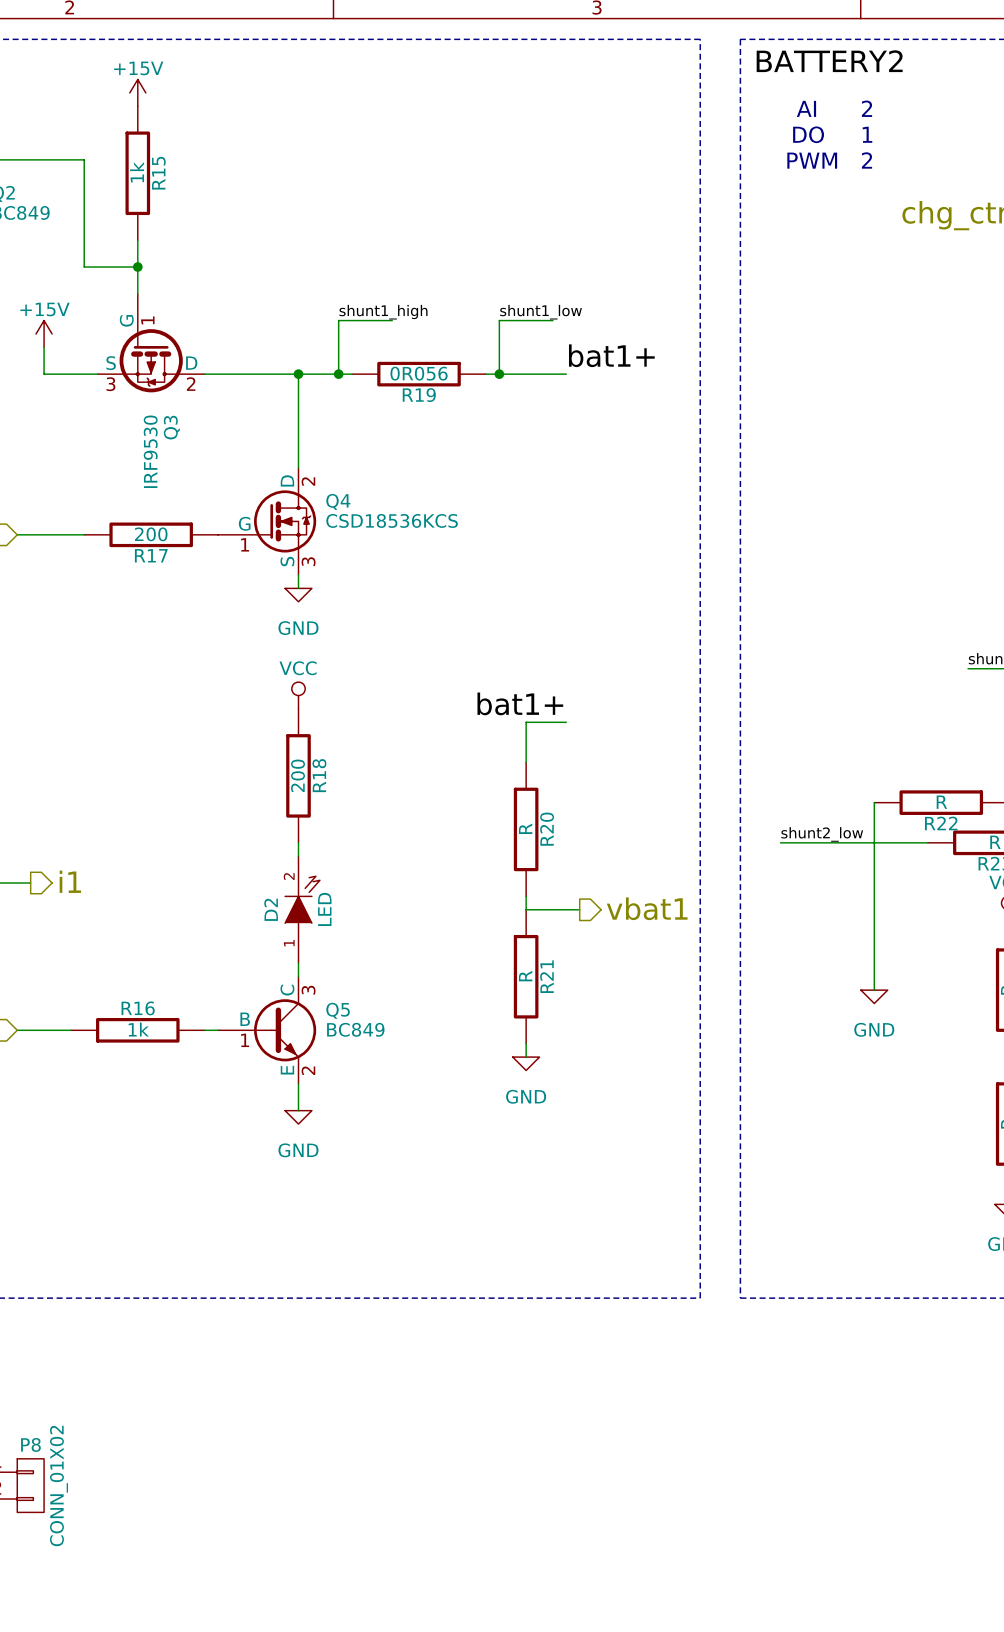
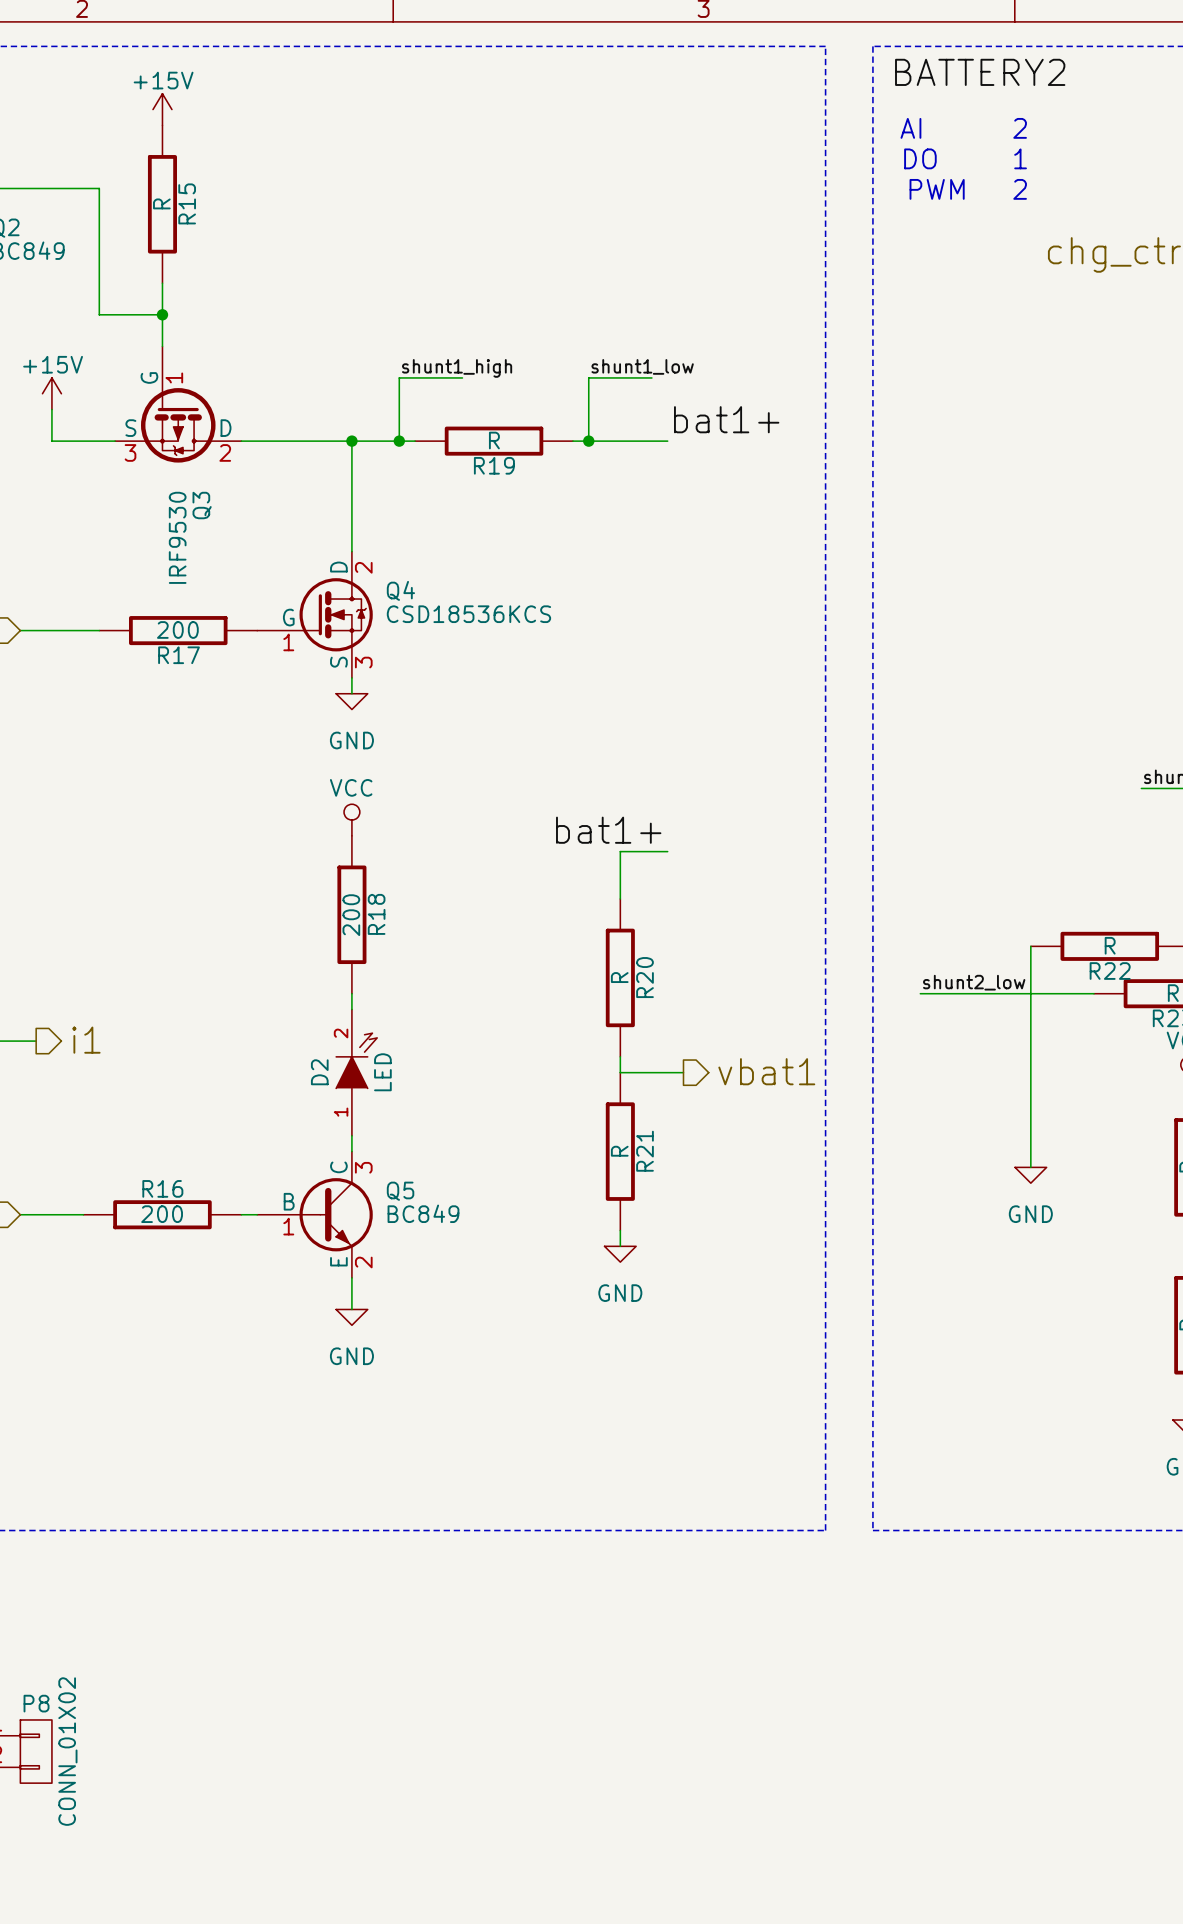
R15 value: 1k (137, 172) -> R (161, 203)
R19 value: 0R056 (419, 373) -> R (494, 440)
R16 value: 1k (138, 1029) -> 200 (162, 1214)

